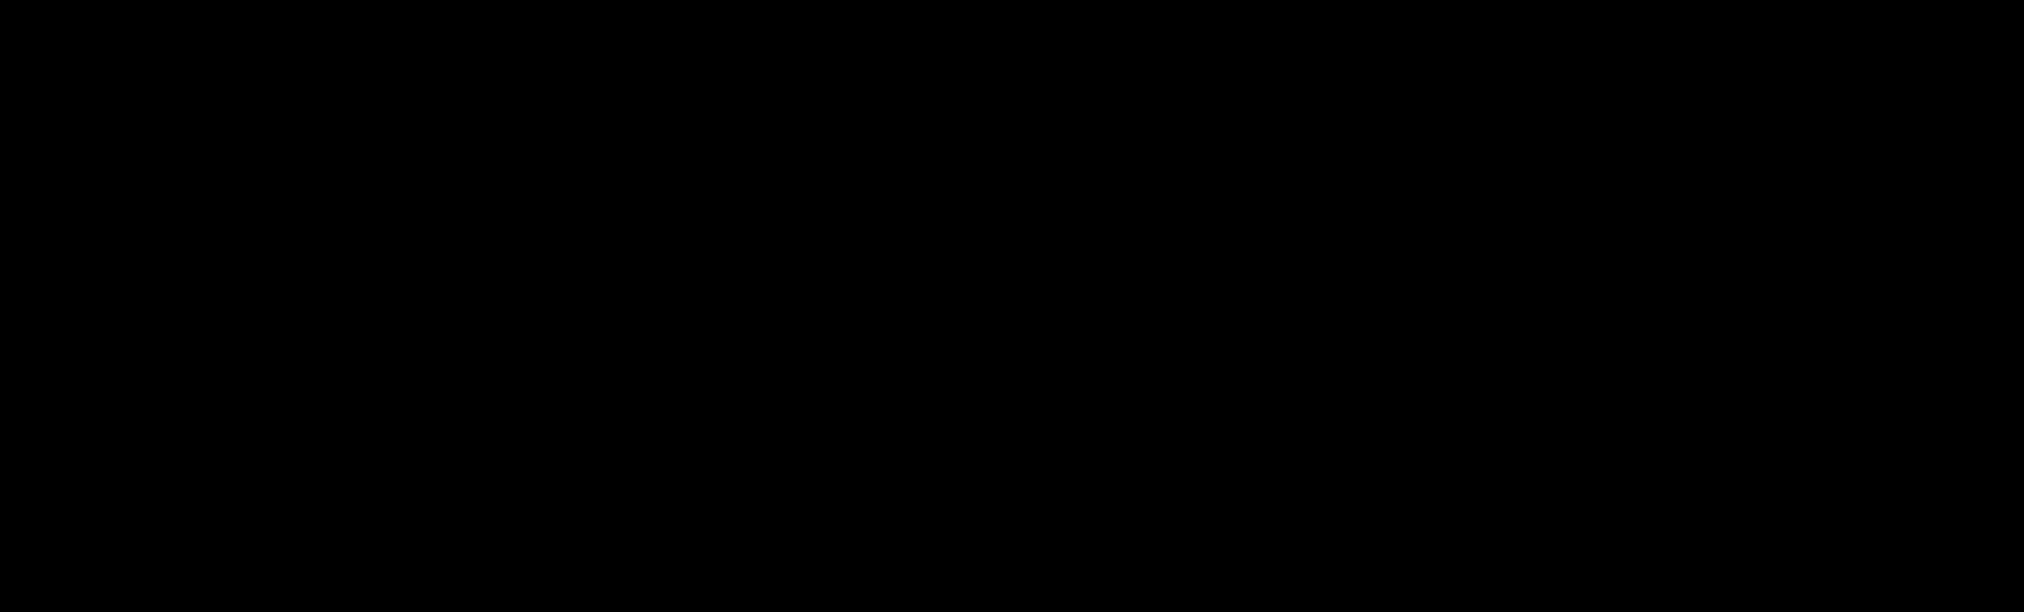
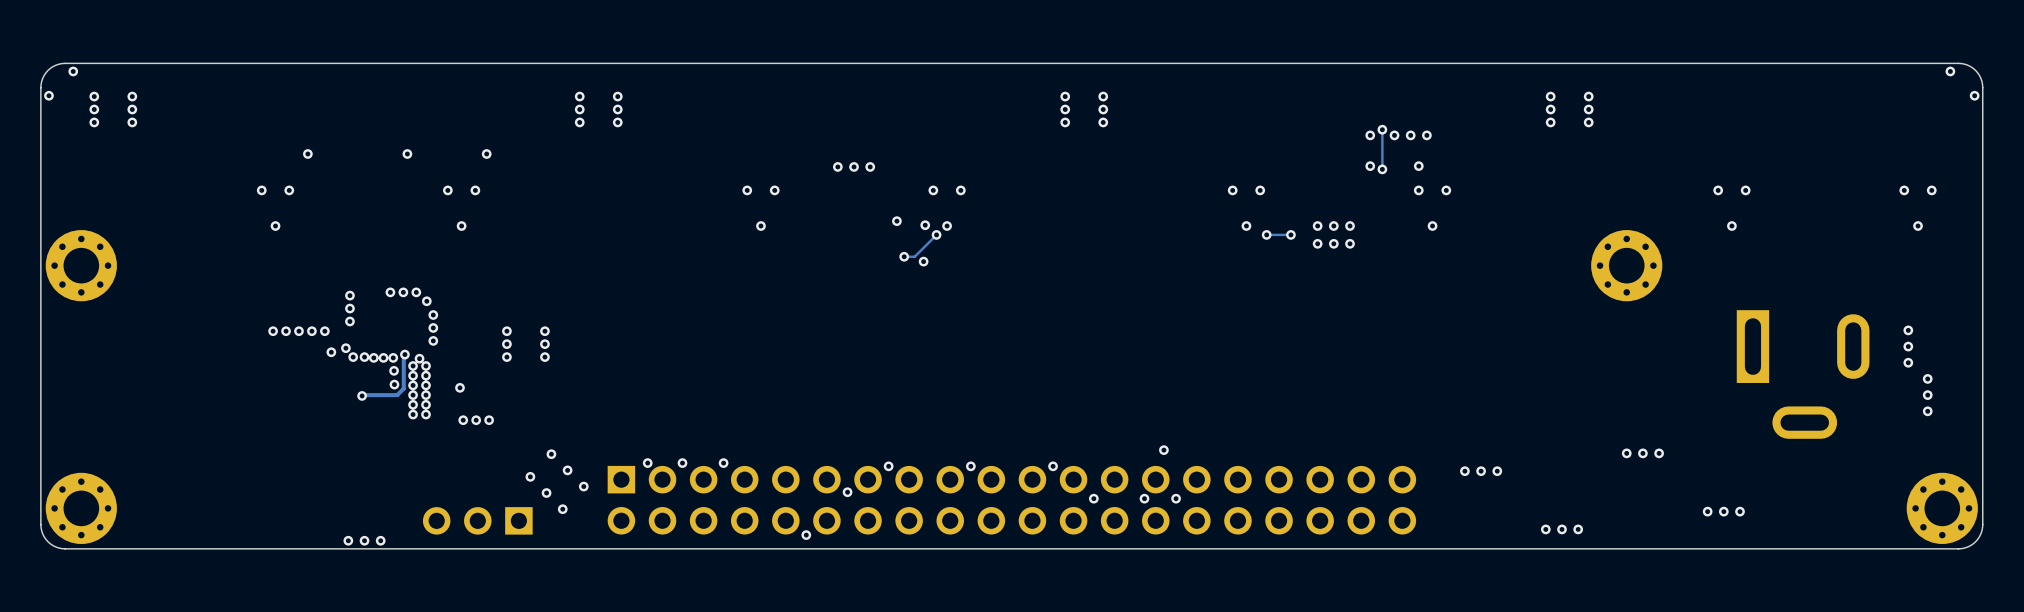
board edge: none -> (1958, 63) (58, 64) (45, 72) (40, 87) (41, 530) (50, 543) (65, 548) (1964, 548) (1977, 539) (1982, 524) (1982, 87) (1980, 78) (1975, 70) (1967, 65) (1958, 63)
via: none -> (73, 71)
via: none -> (1950, 71)
via: none -> (48, 95)
via: none -> (1974, 95)
via: none -> (94, 96)
via: none -> (132, 96)
via: none -> (579, 96)
via: none -> (617, 96)
via: none -> (1065, 96)
via: none -> (1103, 96)
via: none -> (1550, 96)
via: none -> (1588, 96)
via: none -> (94, 109)
via: none -> (132, 109)
via: none -> (579, 109)
via: none -> (617, 109)
via: none -> (1065, 109)
via: none -> (1103, 109)
via: none -> (1550, 109)
via: none -> (1588, 109)
via: none -> (94, 122)
via: none -> (132, 122)
via: none -> (579, 122)
via: none -> (617, 122)
via: none -> (1065, 122)
via: none -> (1103, 122)
via: none -> (1550, 122)
via: none -> (1588, 122)
track: none -> (1382, 129) (1382, 169)
via: none -> (1382, 129)
via: none -> (1370, 135)
via: none -> (1394, 135)
via: none -> (1410, 135)
via: none -> (1426, 135)
via: none -> (307, 154)
via: none -> (407, 154)
via: none -> (486, 154)
via: none -> (837, 166)
via: none -> (854, 166)
via: none -> (870, 166)
via: none -> (1370, 166)
via: none -> (1418, 166)
via: none -> (1382, 169)
via: none -> (261, 190)
via: none -> (289, 190)
via: none -> (447, 190)
via: none -> (475, 190)
via: none -> (747, 190)
via: none -> (774, 190)
via: none -> (933, 190)
via: none -> (960, 190)
via: none -> (1232, 190)
via: none -> (1260, 190)
via: none -> (1418, 190)
via: none -> (1446, 190)
via: none -> (1718, 190)
via: none -> (1745, 190)
via: none -> (1904, 190)
via: none -> (1931, 190)
via: none -> (896, 221)
via: none -> (925, 225)
via: none -> (275, 226)
via: none -> (461, 226)
via: none -> (760, 226)
via: none -> (947, 226)
via: none -> (1246, 226)
via: none -> (1317, 226)
via: none -> (1333, 226)
via: none -> (1350, 226)
via: none -> (1432, 226)
via: none -> (1731, 226)
via: none -> (1918, 226)
track: none -> (936, 234) (914, 256) (904, 256)
via: none -> (936, 234)
via: none -> (1266, 234)
track: none -> (1290, 234) (1266, 234)
via: none -> (1290, 234)
via: none -> (1317, 243)
via: none -> (1333, 243)
via: none -> (1350, 243)
via: none -> (904, 256)
via: none -> (923, 261)
part: none -> (81, 265)
part: none -> (1626, 265)
via: none -> (390, 292)
via: none -> (403, 292)
via: none -> (416, 292)
via: none -> (349, 295)
via: none -> (426, 301)
via: none -> (349, 308)
via: none -> (433, 315)
via: none -> (349, 321)
via: none -> (433, 327)
via: none -> (1908, 330)
via: none -> (273, 331)
via: none -> (286, 331)
via: none -> (298, 331)
via: none -> (311, 331)
via: none -> (324, 331)
via: none -> (506, 331)
via: none -> (544, 331)
via: none -> (433, 340)
via: none -> (506, 344)
via: none -> (544, 344)
via: none -> (1908, 346)
via: none -> (345, 348)
via: none -> (331, 352)
via: none -> (404, 354)
via: none -> (353, 357)
via: none -> (364, 357)
via: none -> (373, 357)
via: none -> (383, 357)
via: none -> (393, 357)
via: none -> (506, 357)
via: none -> (544, 357)
via: none -> (419, 358)
track: none -> (403, 359) (403, 388) (397, 395) (362, 395)
via: none -> (1908, 362)
via: none -> (413, 365)
via: none -> (426, 365)
via: none -> (394, 370)
part: none -> (1803, 374)
via: none -> (413, 375)
via: none -> (426, 375)
via: none -> (1927, 378)
via: none -> (394, 384)
via: none -> (413, 385)
via: none -> (426, 385)
via: none -> (459, 387)
via: none -> (362, 395)
via: none -> (413, 395)
via: none -> (426, 395)
via: none -> (1927, 395)
via: none -> (413, 404)
via: none -> (426, 404)
via: none -> (1927, 411)
via: none -> (413, 414)
via: none -> (426, 414)
via: none -> (463, 420)
via: none -> (476, 420)
via: none -> (489, 420)
via: none -> (1163, 450)
via: none -> (1626, 453)
via: none -> (1642, 453)
via: none -> (1659, 453)
via: none -> (551, 454)
via: none -> (647, 463)
via: none -> (682, 463)
via: none -> (723, 463)
via: none -> (888, 466)
via: none -> (970, 466)
via: none -> (1053, 466)
via: none -> (567, 470)
via: none -> (1464, 471)
via: none -> (1481, 471)
via: none -> (1497, 471)
via: none -> (530, 476)
via: none -> (583, 486)
via: none -> (847, 492)
via: none -> (546, 493)
via: none -> (1093, 498)
via: none -> (1144, 498)
via: none -> (1176, 498)
part: none -> (1011, 500)
part: none -> (81, 508)
part: none -> (1942, 508)
via: none -> (562, 509)
via: none -> (1707, 511)
via: none -> (1723, 511)
via: none -> (1740, 511)
part: none -> (477, 520)
via: none -> (1545, 529)
via: none -> (1562, 529)
via: none -> (1578, 529)
via: none -> (806, 535)
via: none -> (348, 540)
via: none -> (364, 540)
via: none -> (380, 540)

